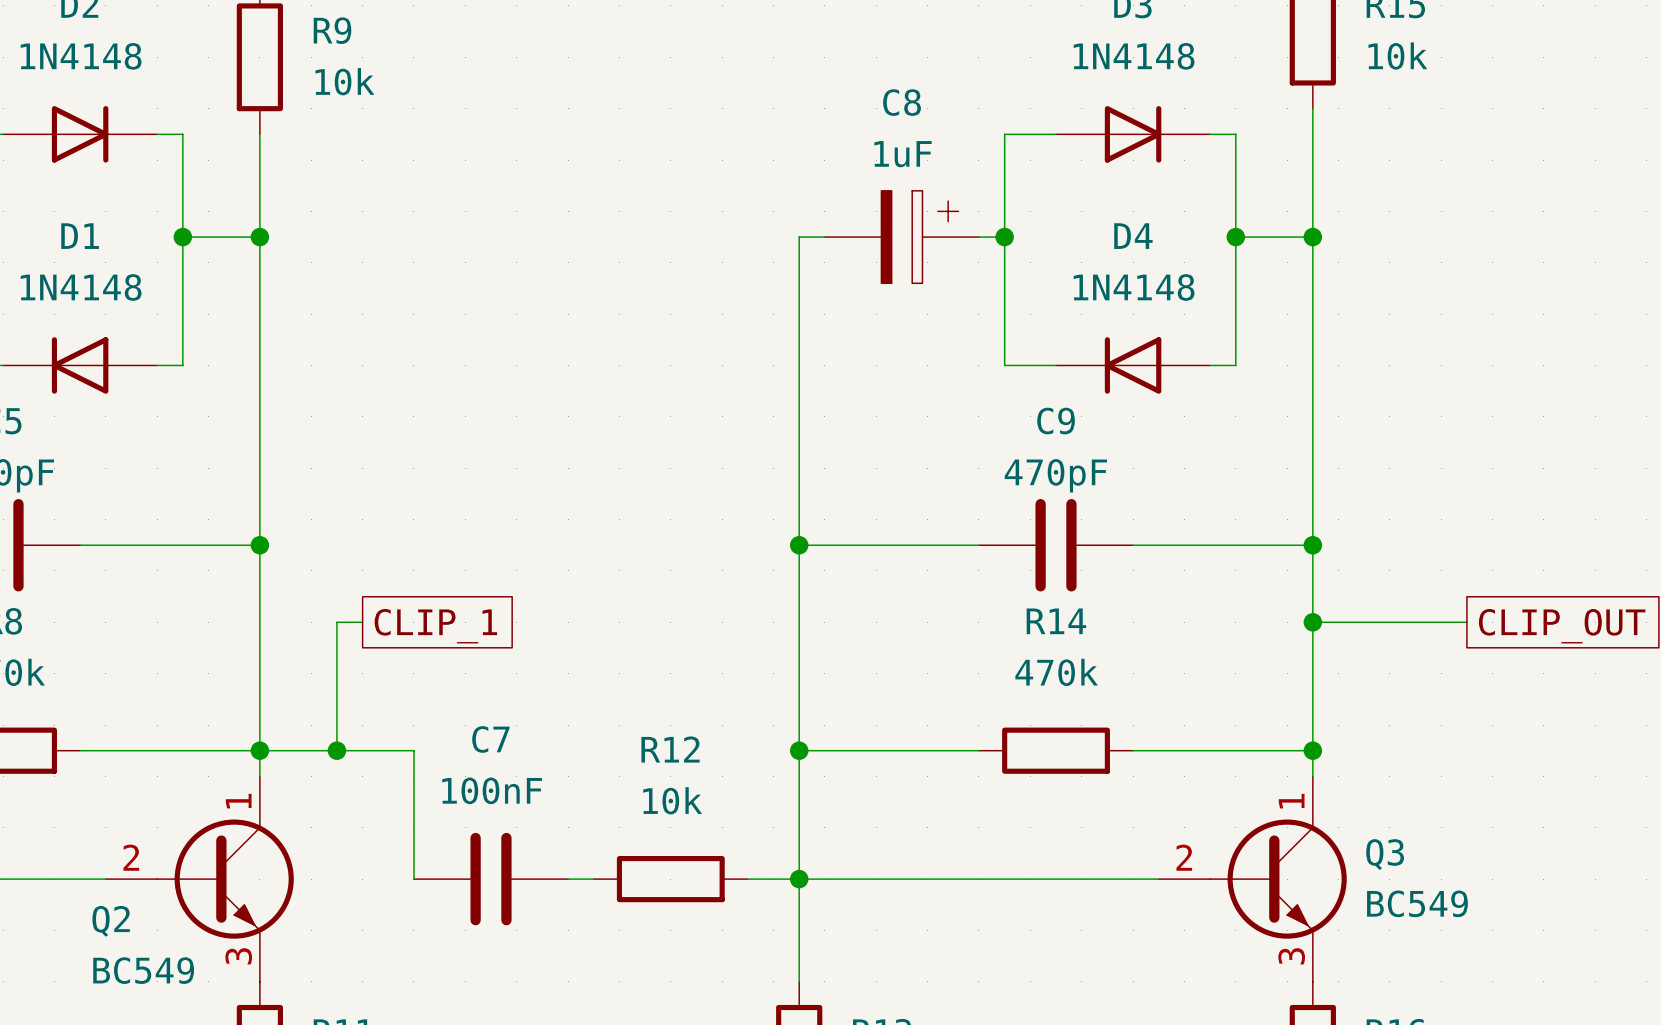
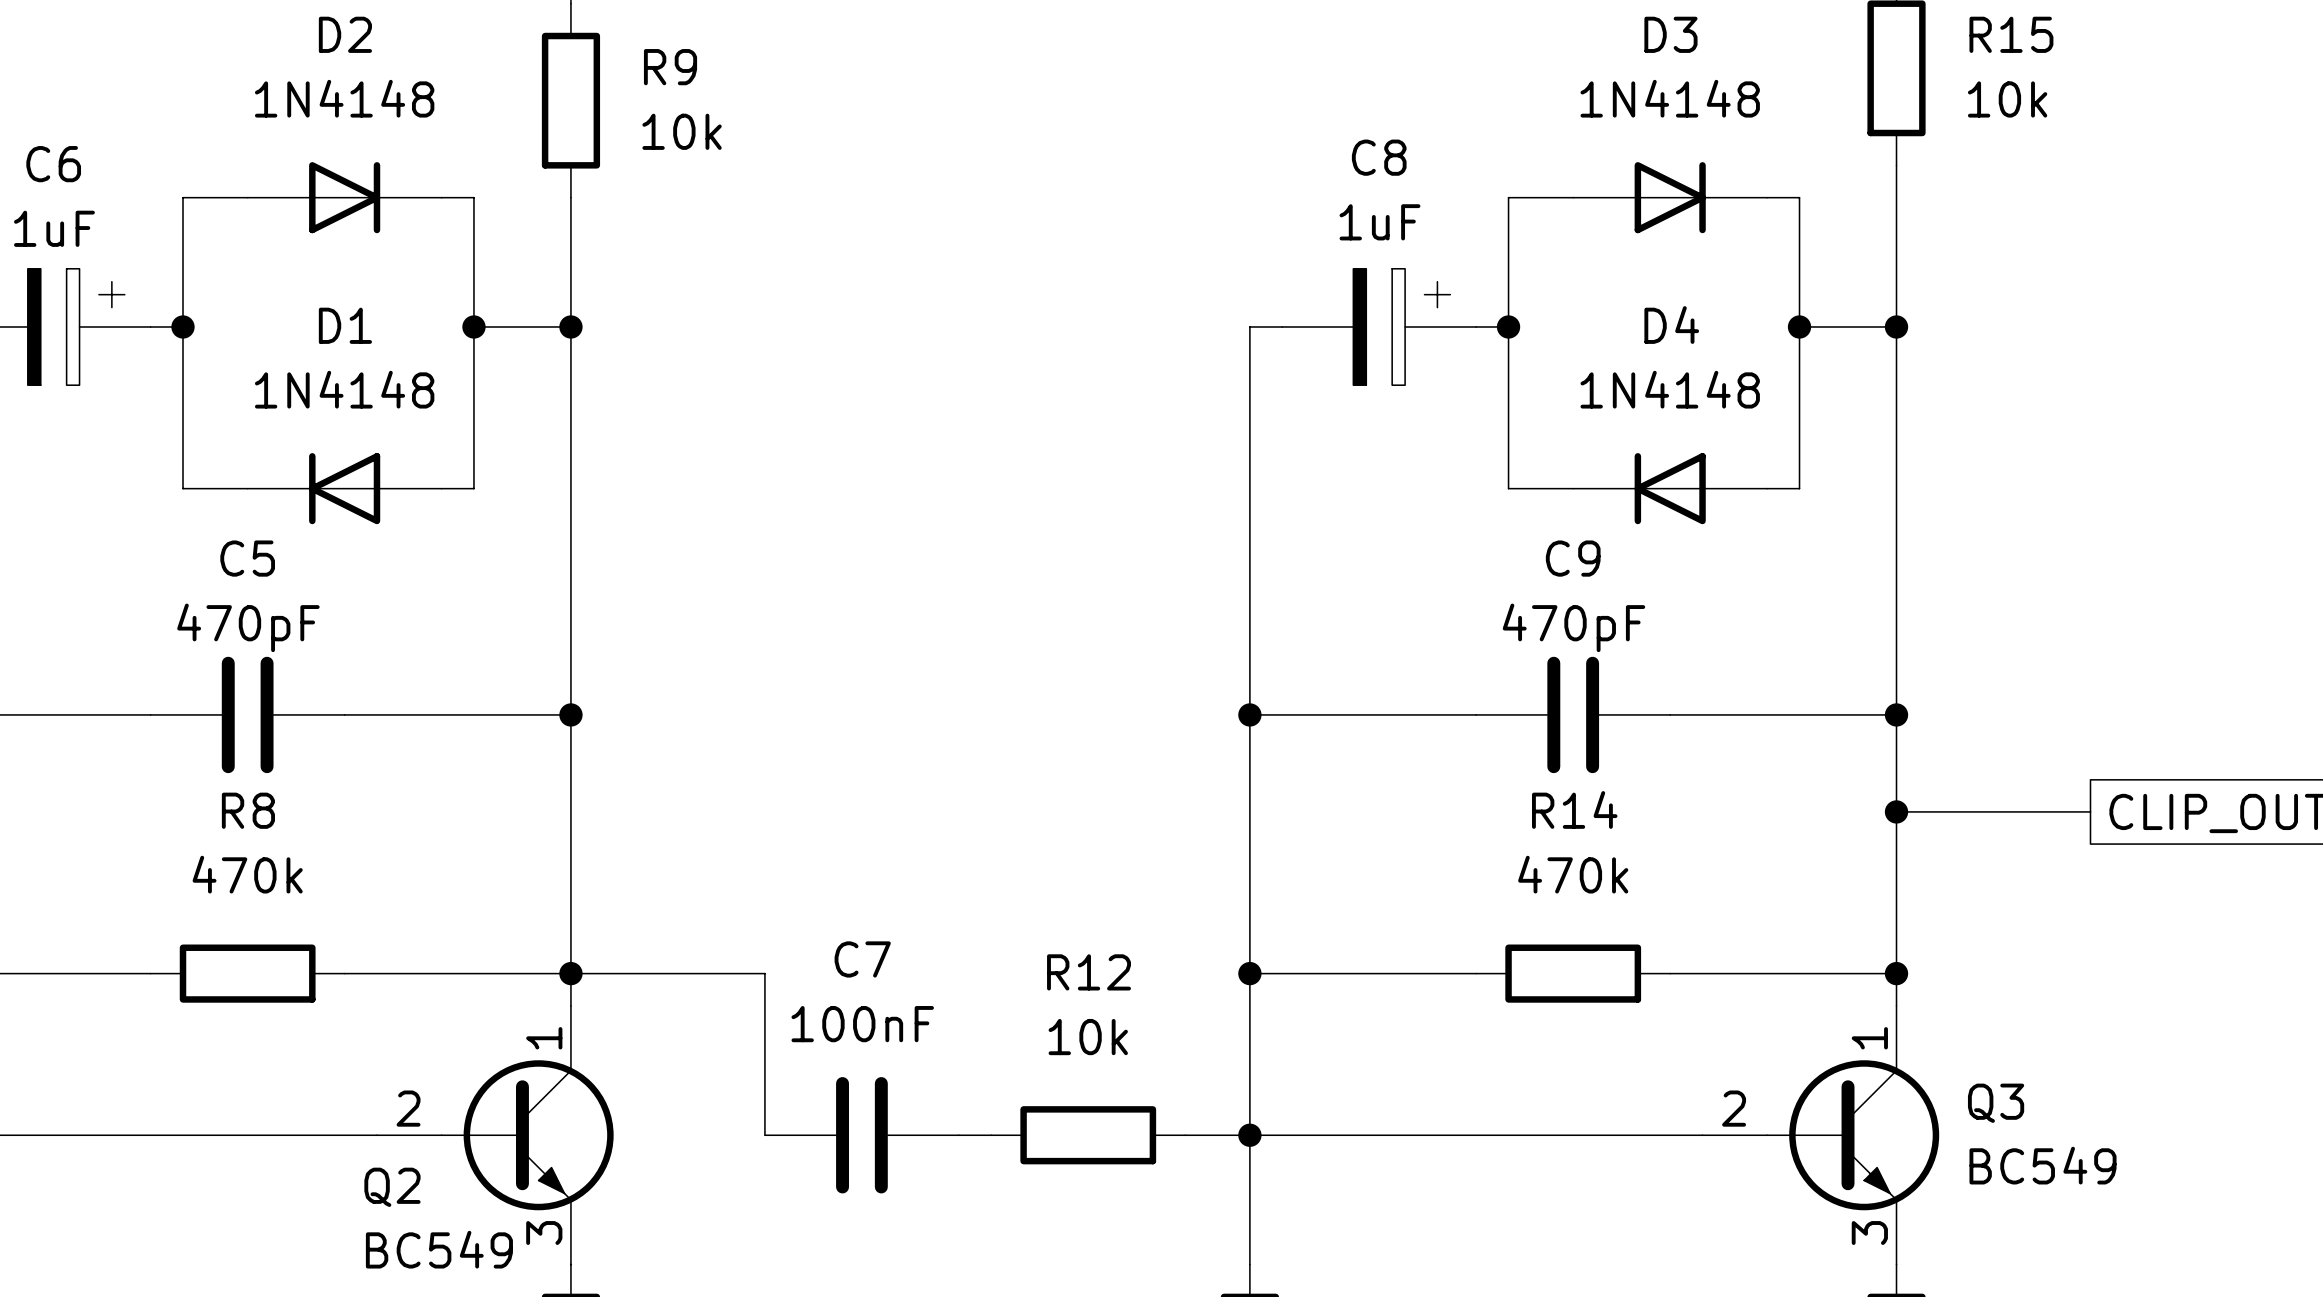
wire: (362, 622) (336, 622) (336, 750) -> none
global label: CLIP_1 (435, 626) -> none
junction: (336, 750) -> none

